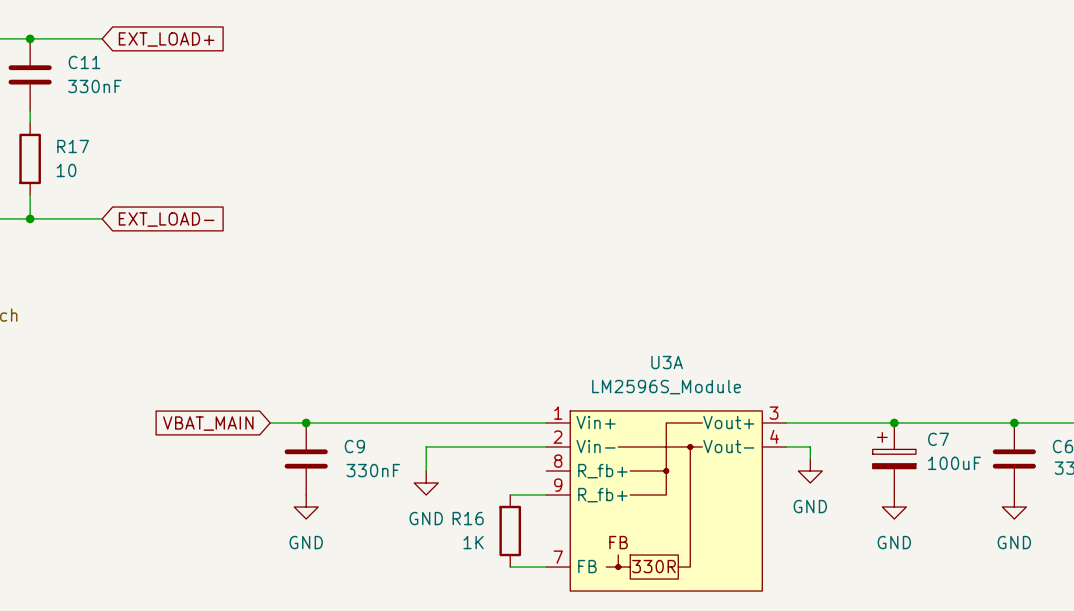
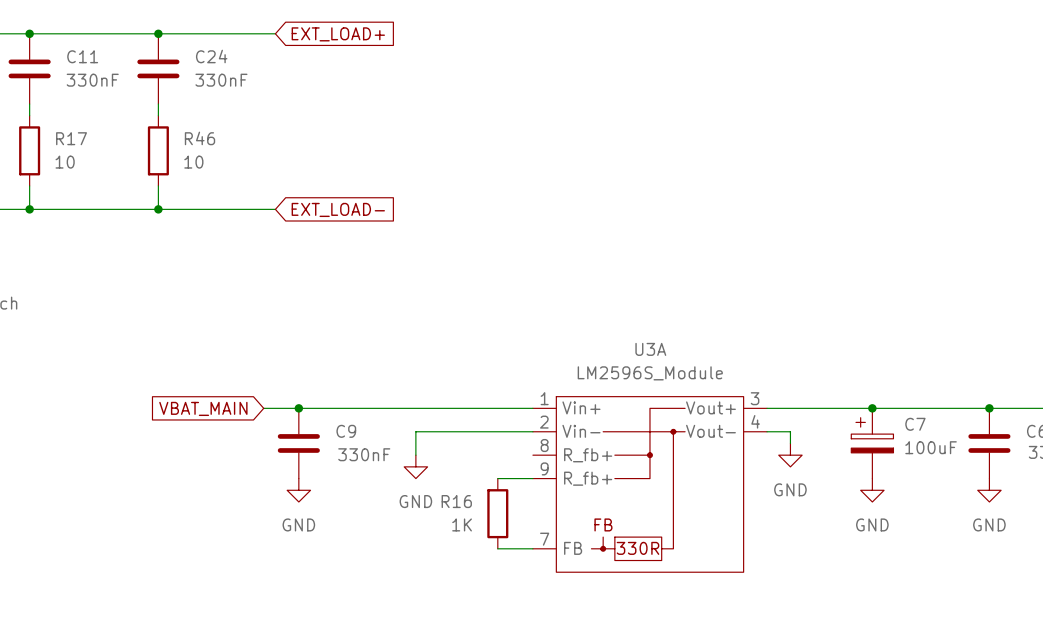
wire: none -> (99, 33) (275, 33)
junction: none -> (158, 33)
global label position: EXT_LOAD+ (166, 39) -> EXT_LOAD+ (338, 34)
C24: none -> 330nF (158, 68)
wire: none -> (158, 104) (158, 115)
R46: none -> 10 (158, 150)
wire: none -> (158, 185) (158, 209)
wire: none -> (99, 209) (275, 209)
junction: none -> (158, 209)
global label position: EXT_LOAD- (166, 219) -> EXT_LOAD- (338, 209)

